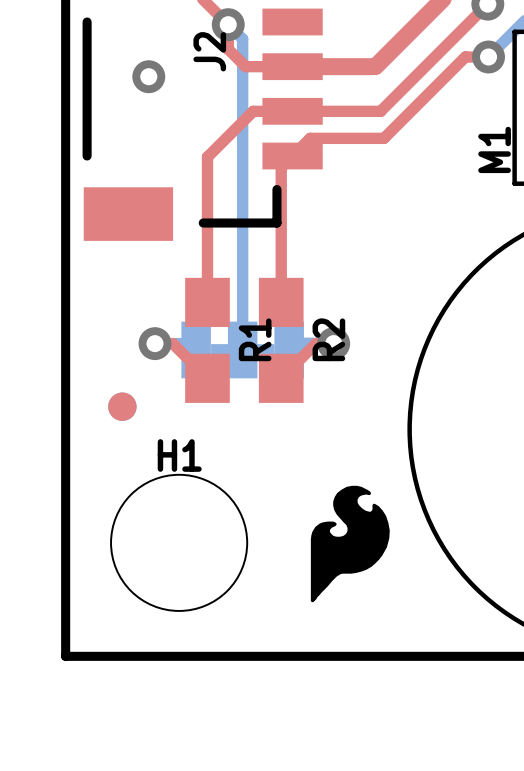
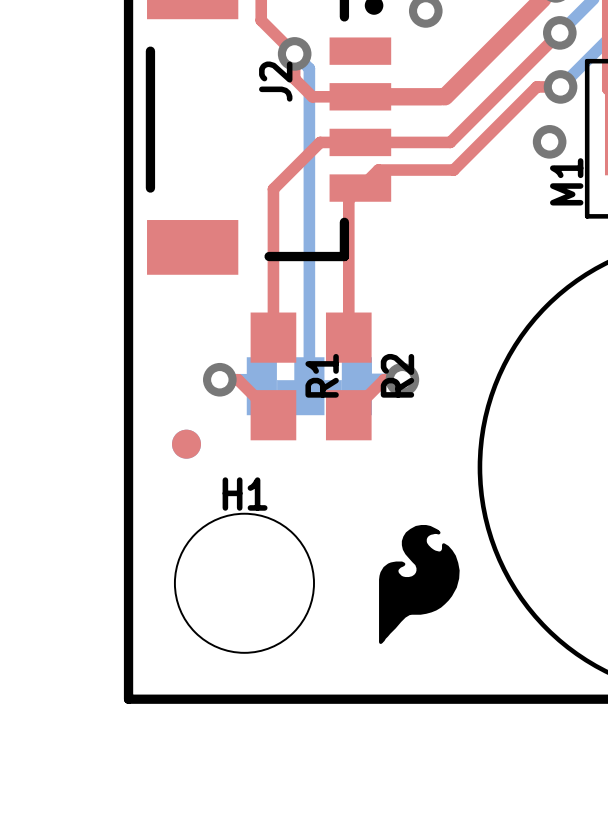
via: (148, 76) -> none
via: none -> (549, 141)

